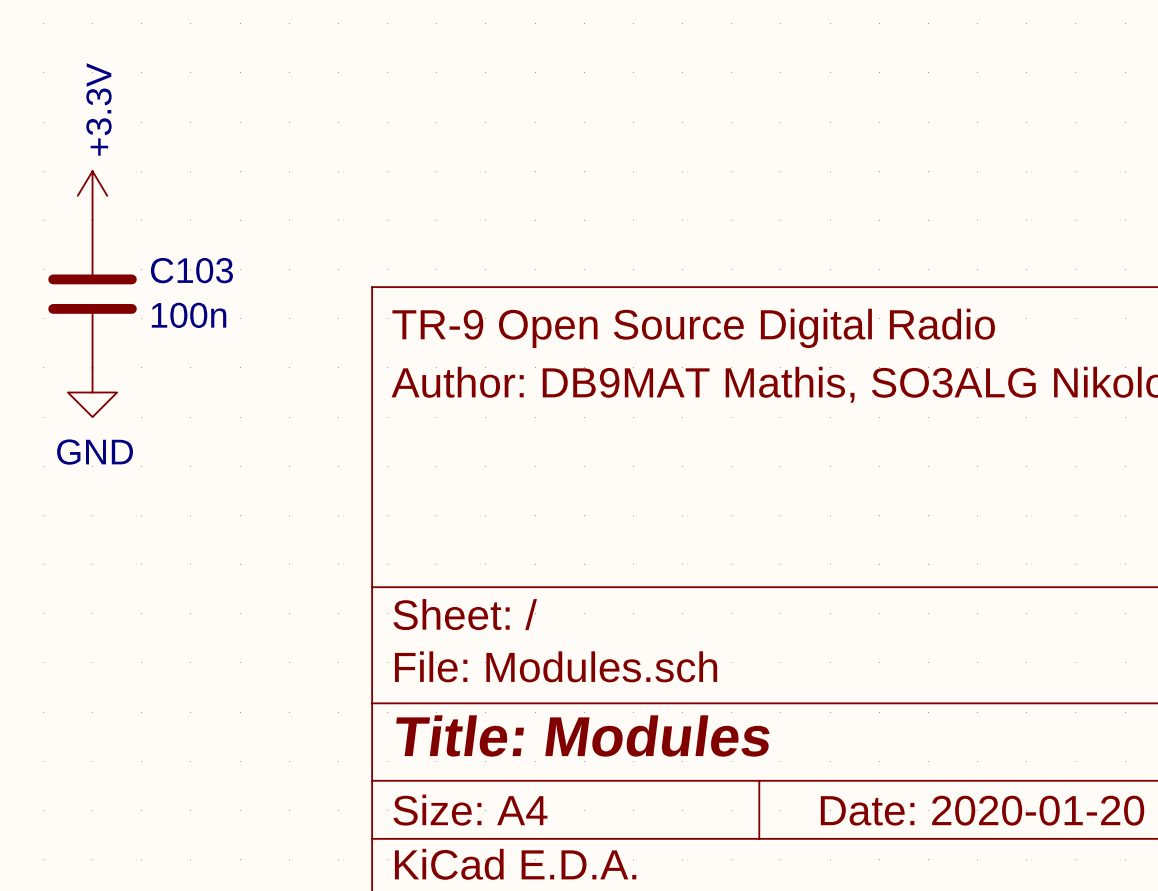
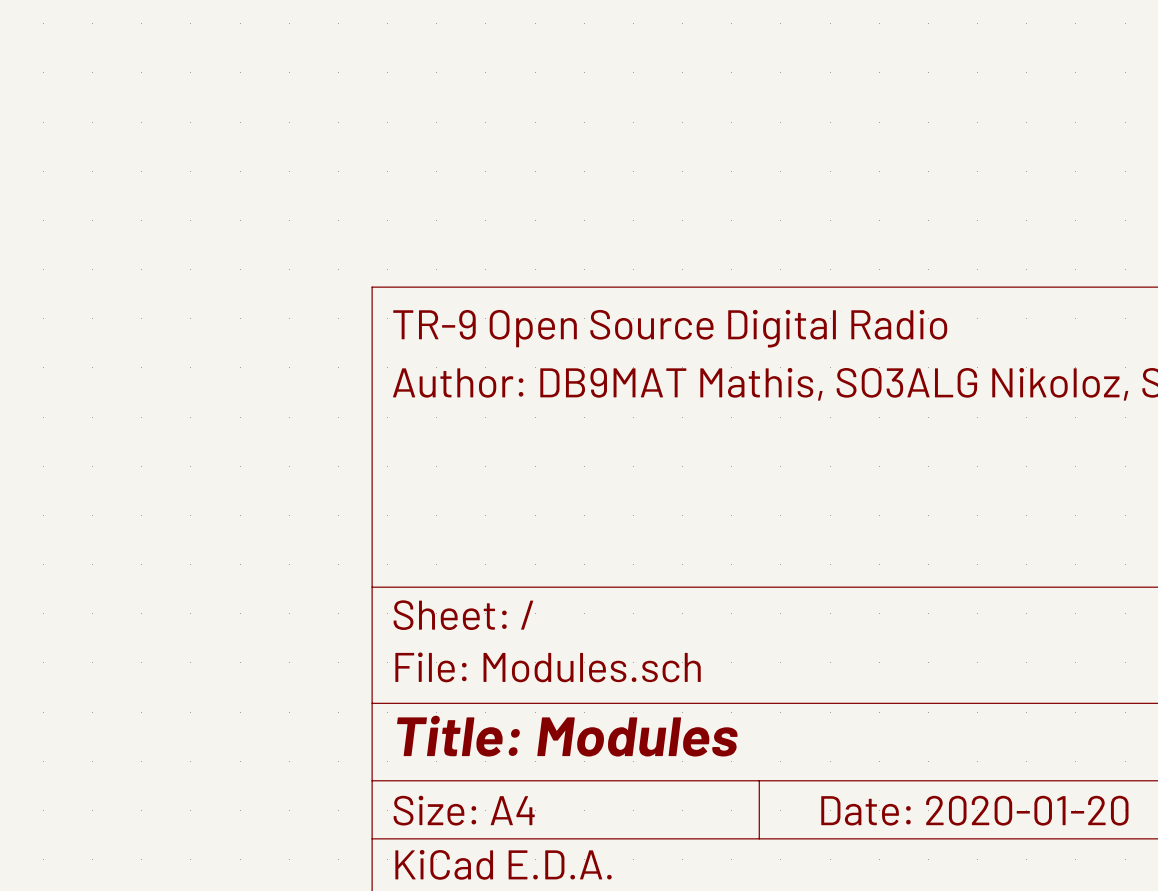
power symbol: +3.3V (92, 195) -> none
C103: 100n (92, 294) -> none
power symbol: GND (92, 392) -> none

